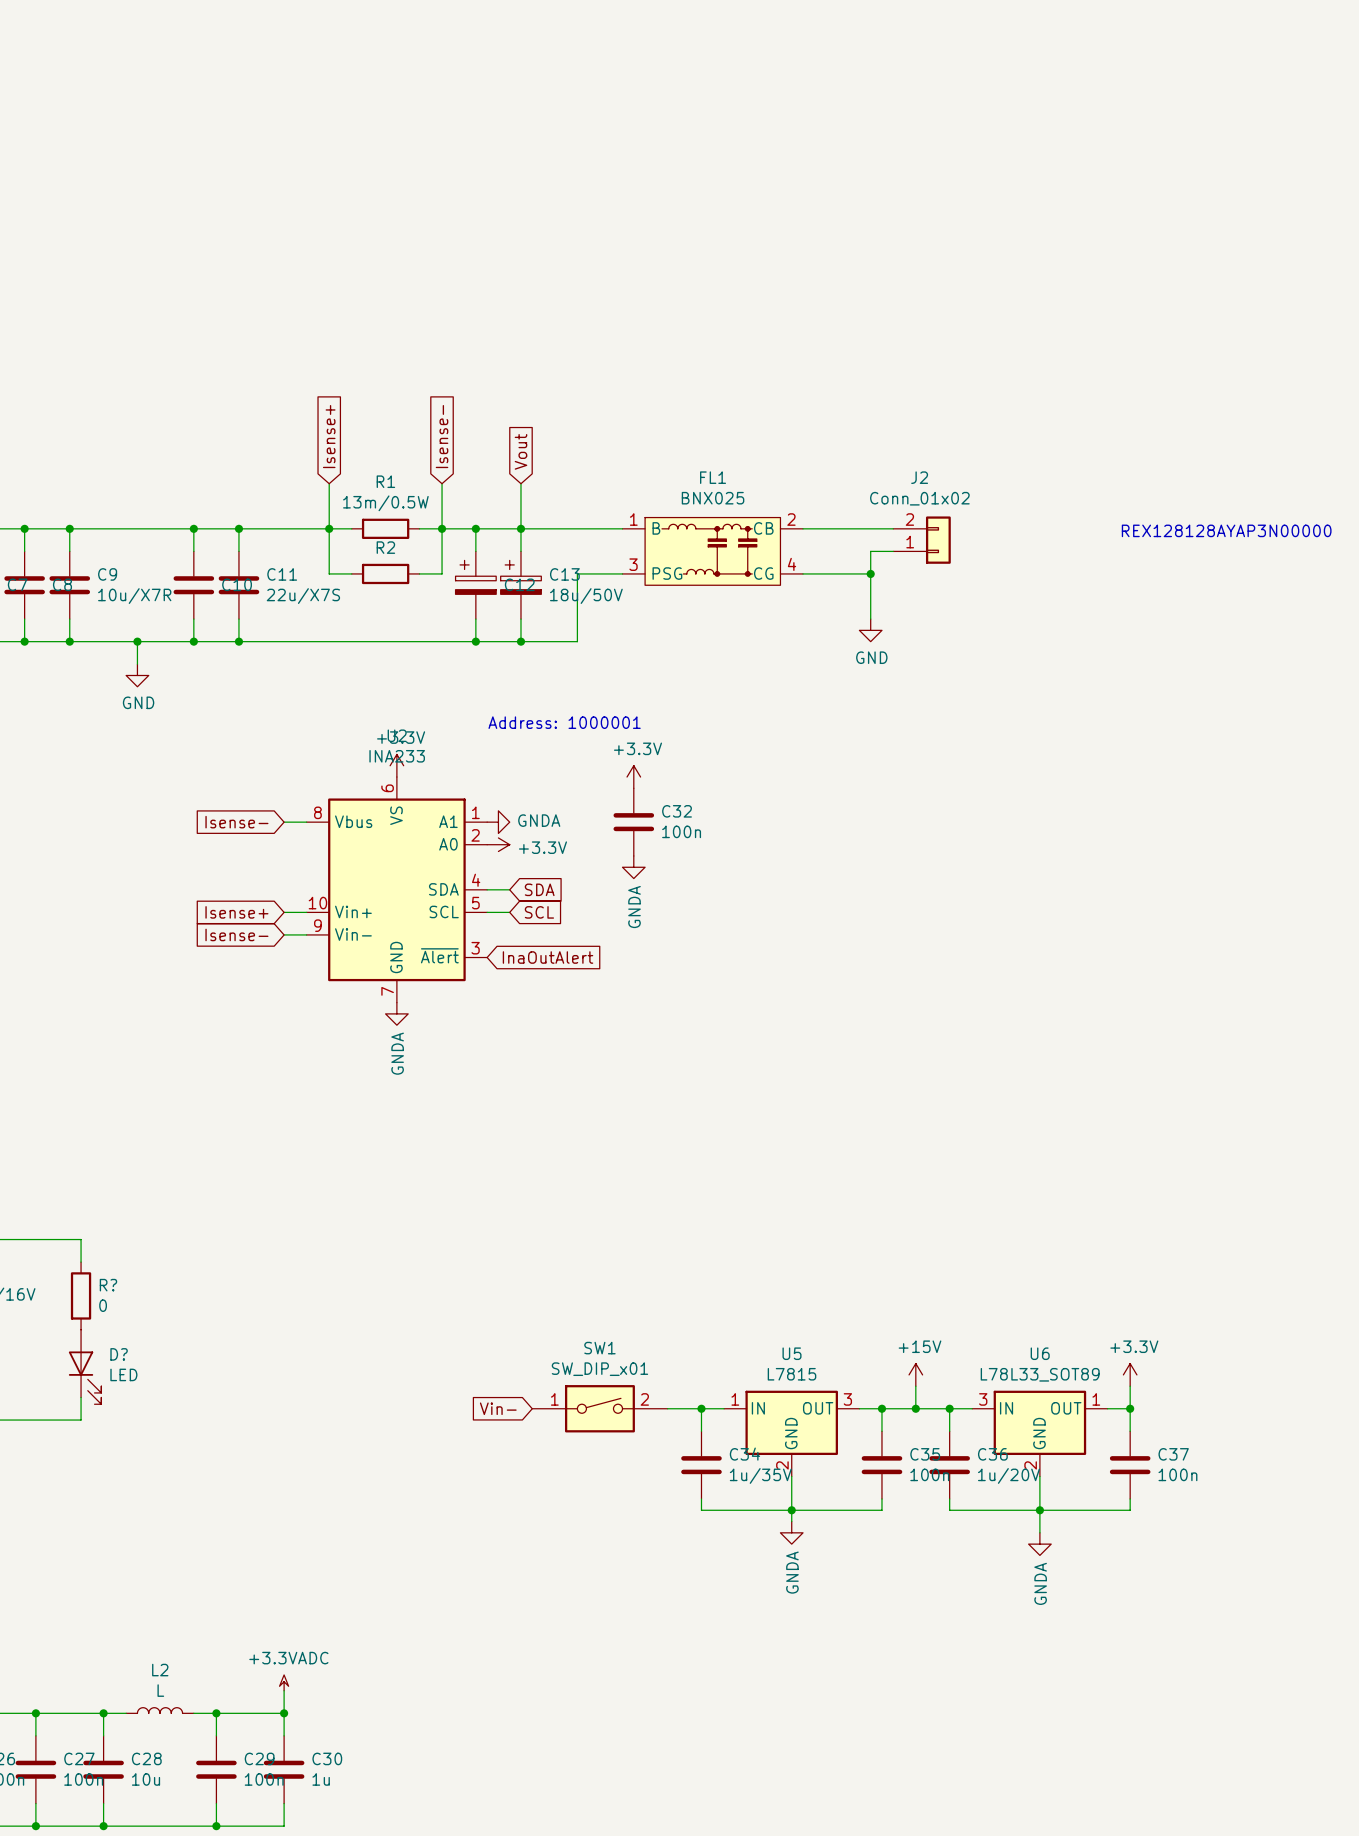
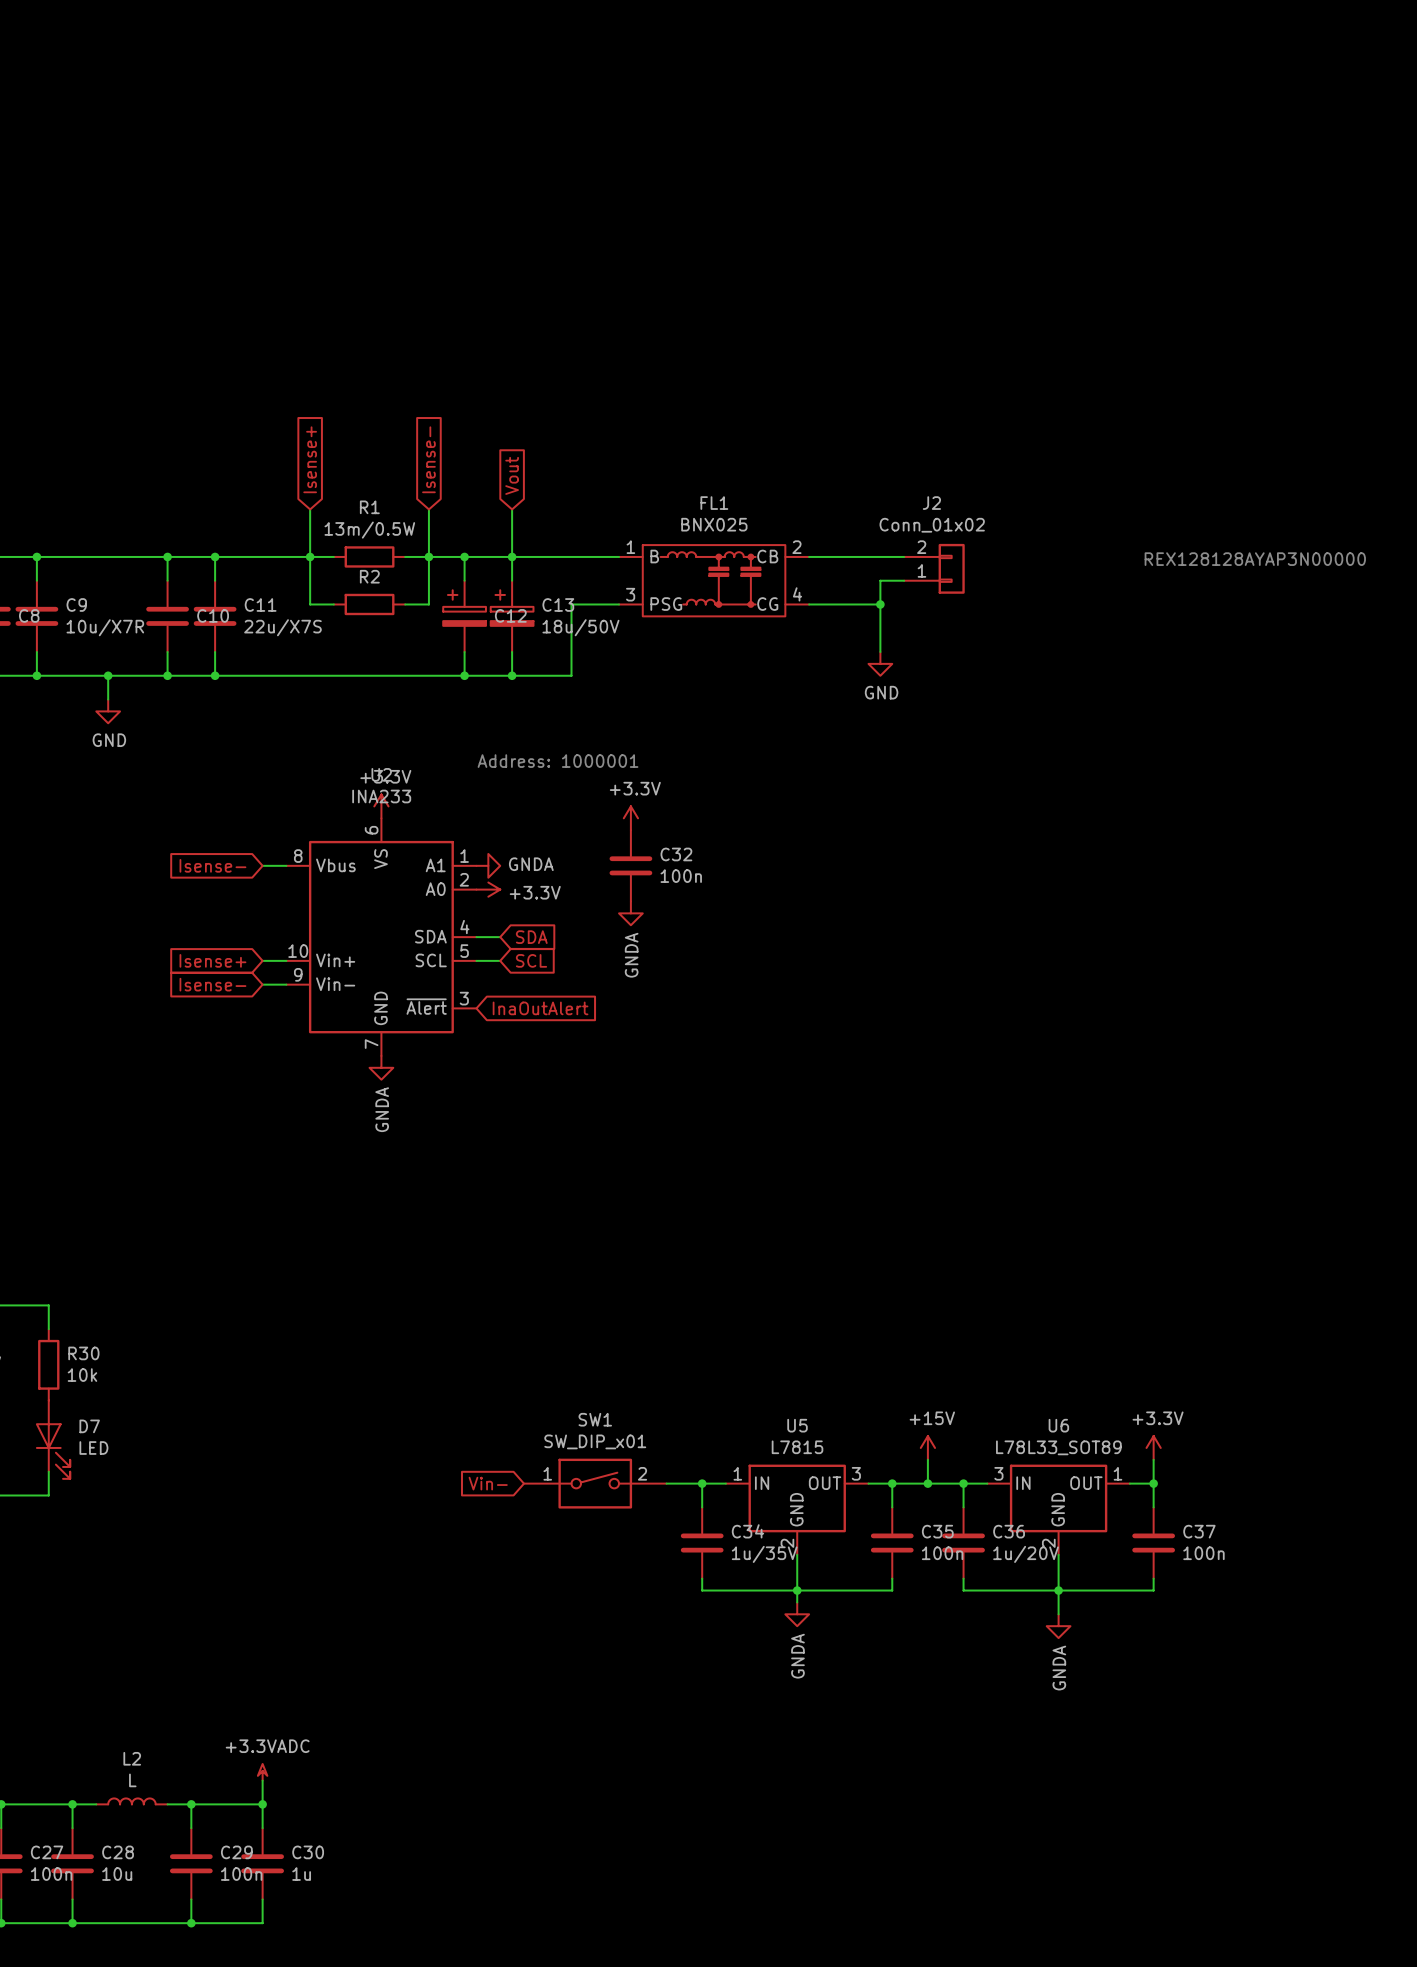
R? name: R? (108, 1285) -> R30 (83, 1353)
R? value: 0 (103, 1305) -> 10k (82, 1375)
D? name: D? (119, 1354) -> D7 (89, 1426)

